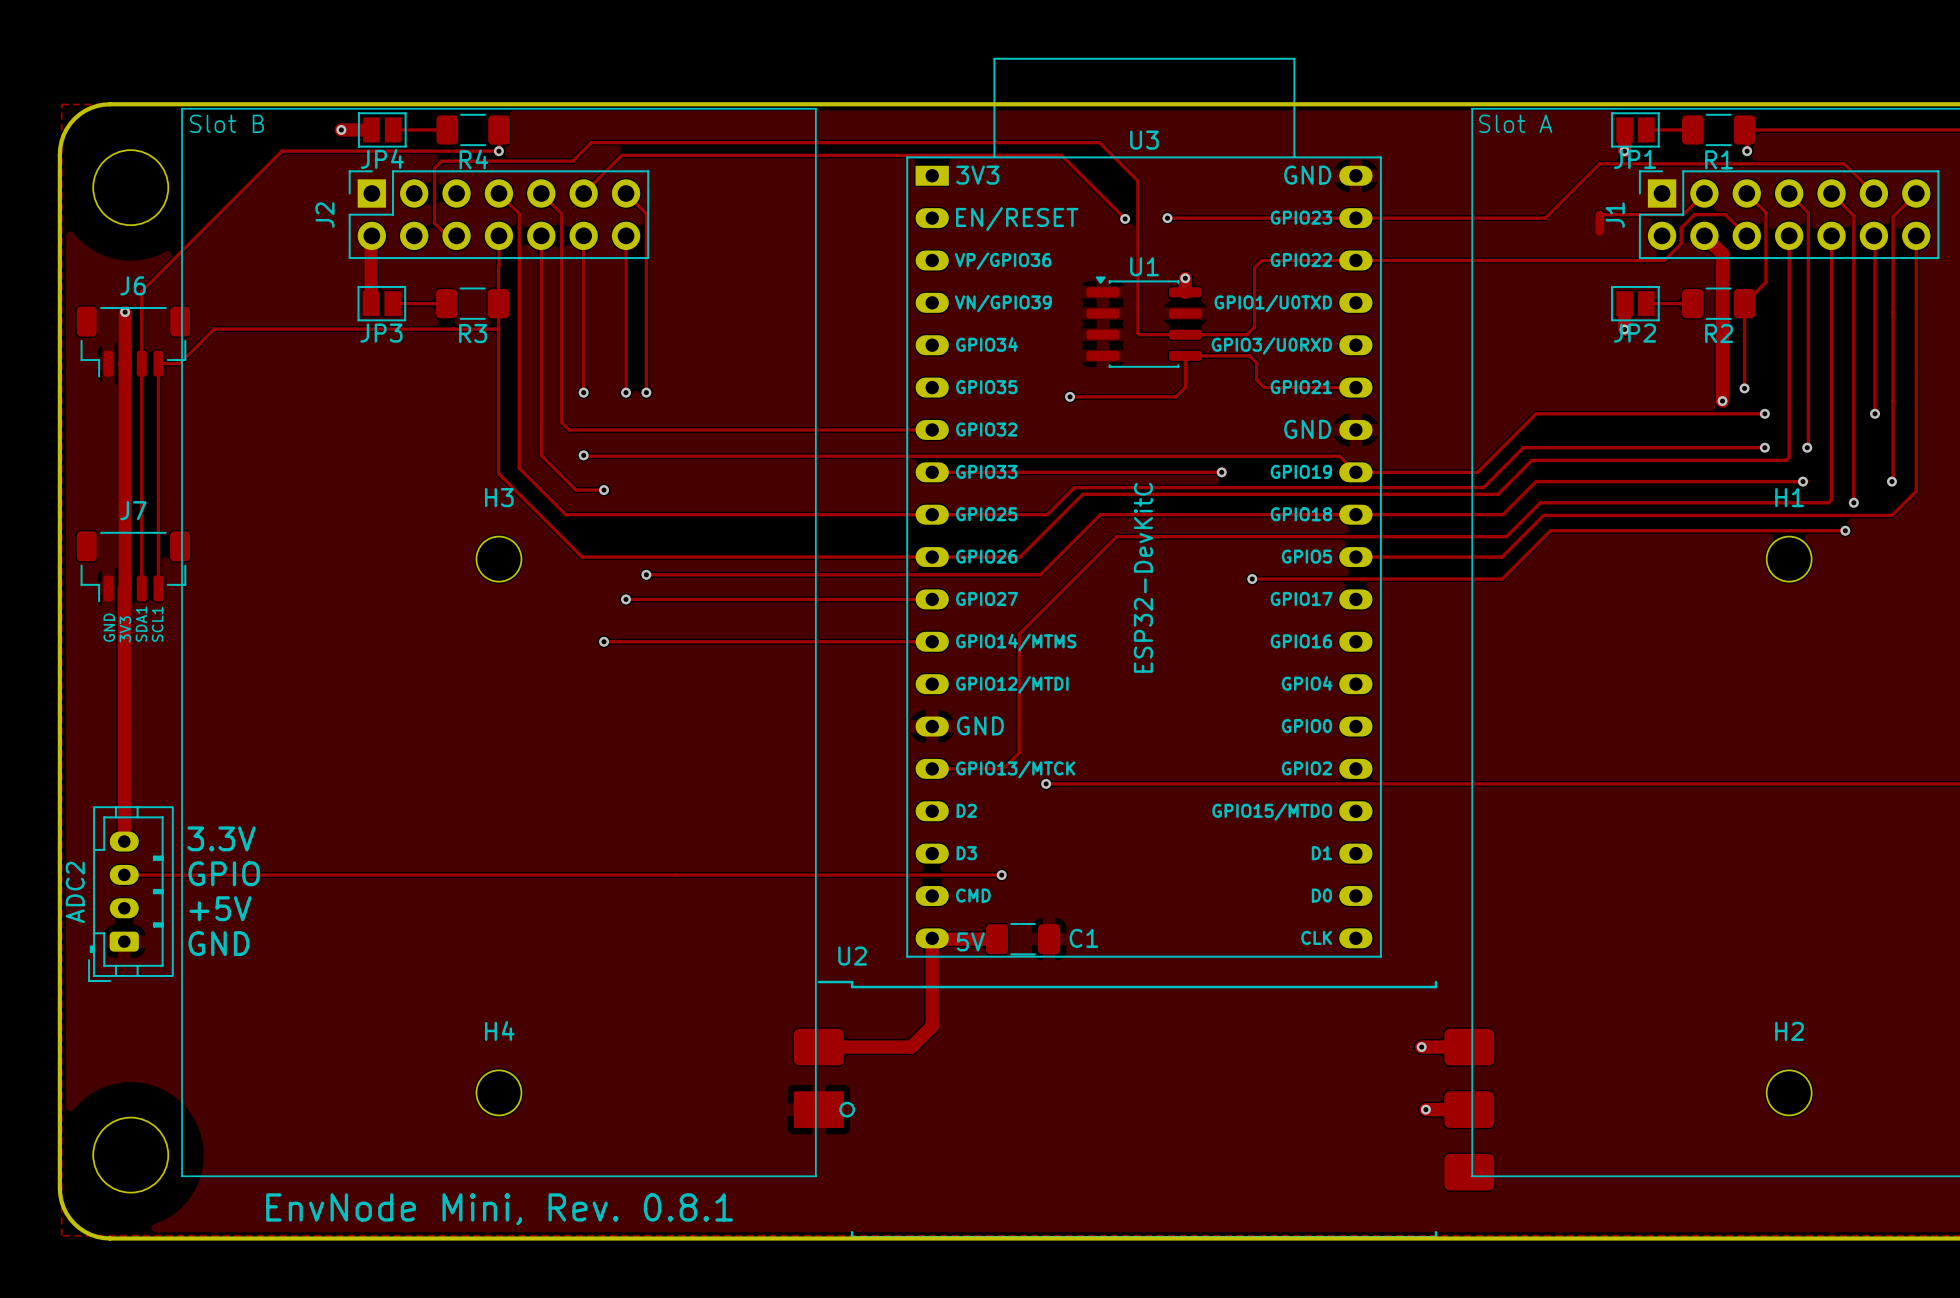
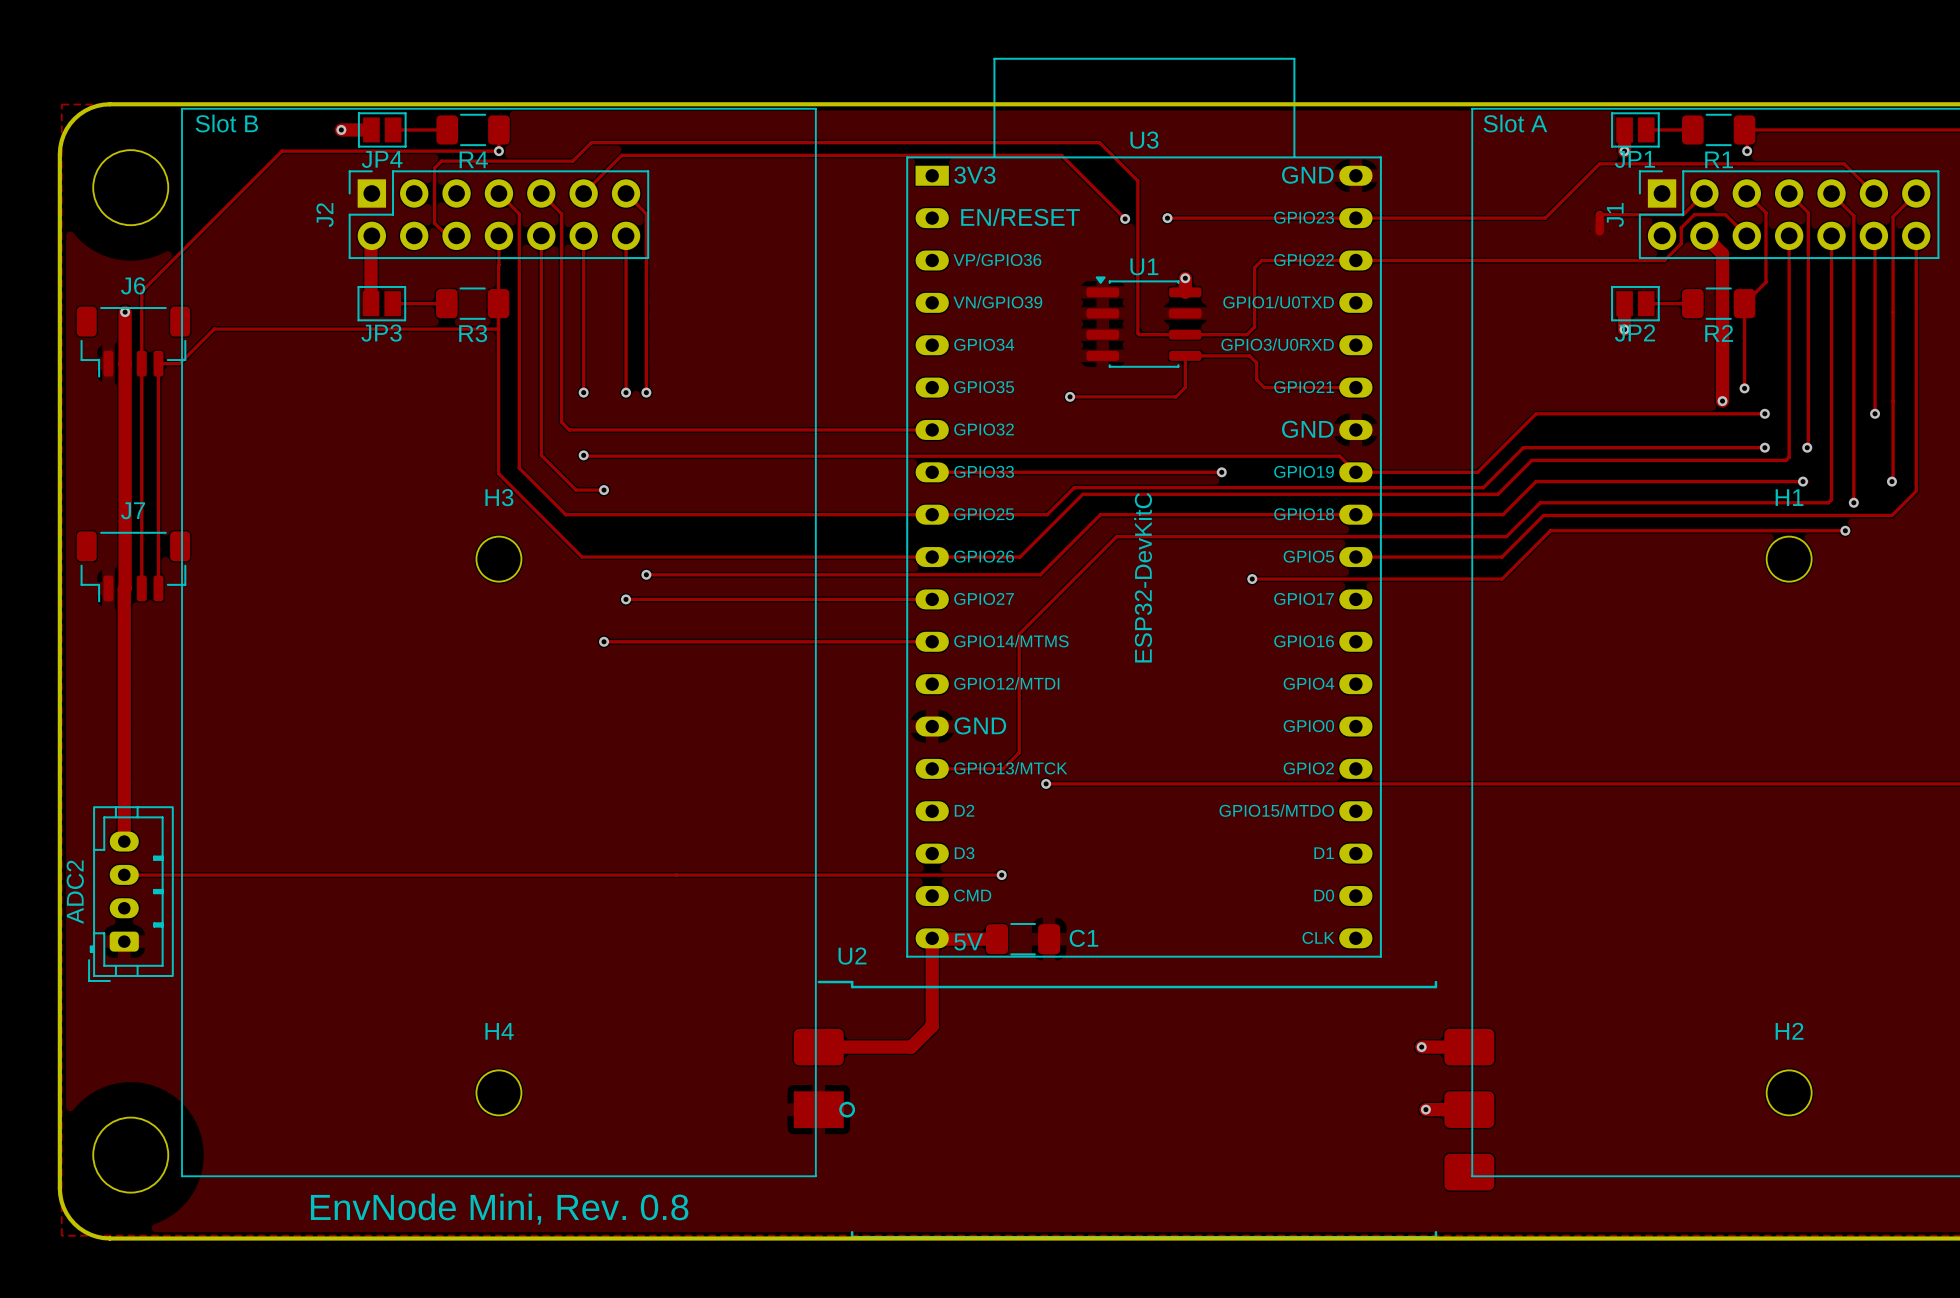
text: SDA1 (141, 624) -> none
text: SCL1 (157, 624) -> none
text: GND (109, 627) -> none
text: 3V3 (125, 629) -> none
text: 3.3V (221, 838) -> none
text: GPIO (224, 873) -> none
text: +5V (220, 908) -> none
text: GND (218, 943) -> none
text: EnvNode Mini, Rev. 0.8.1 (499, 1209) -> EnvNode Mini, Rev. 0.8 (499, 1209)

